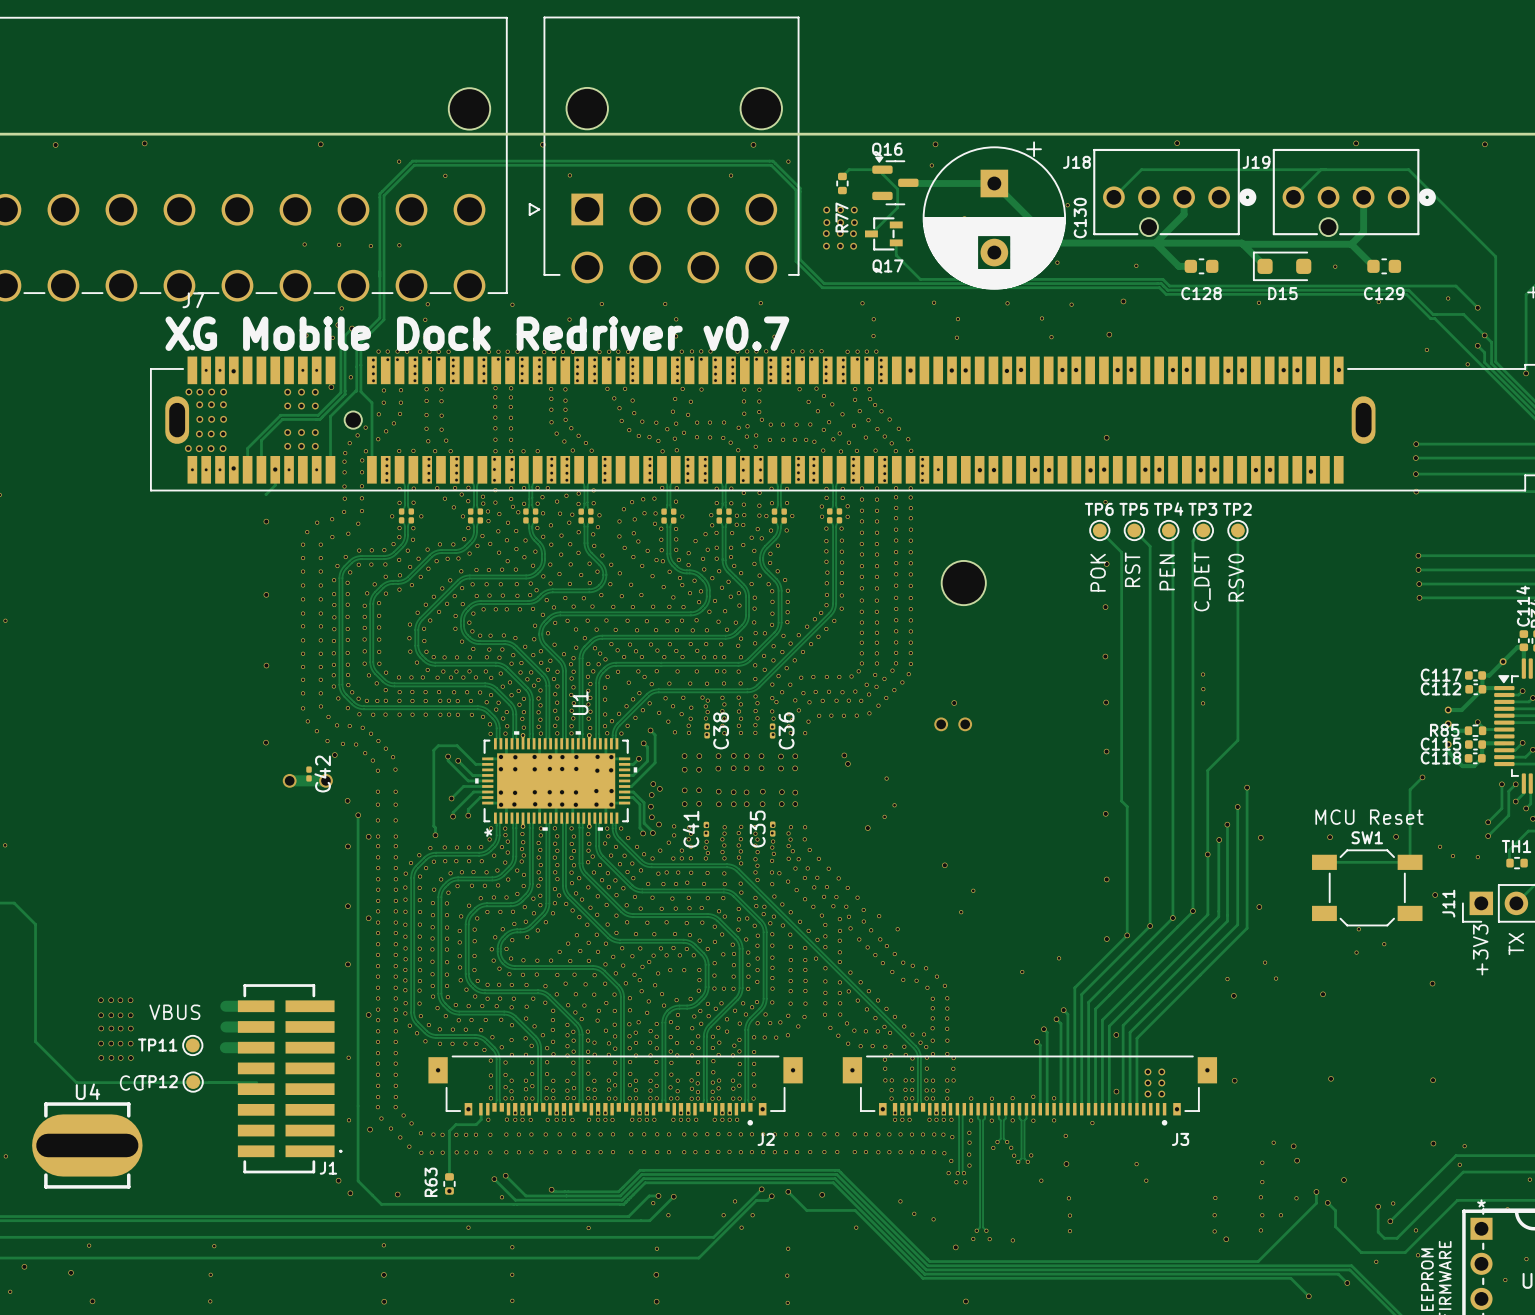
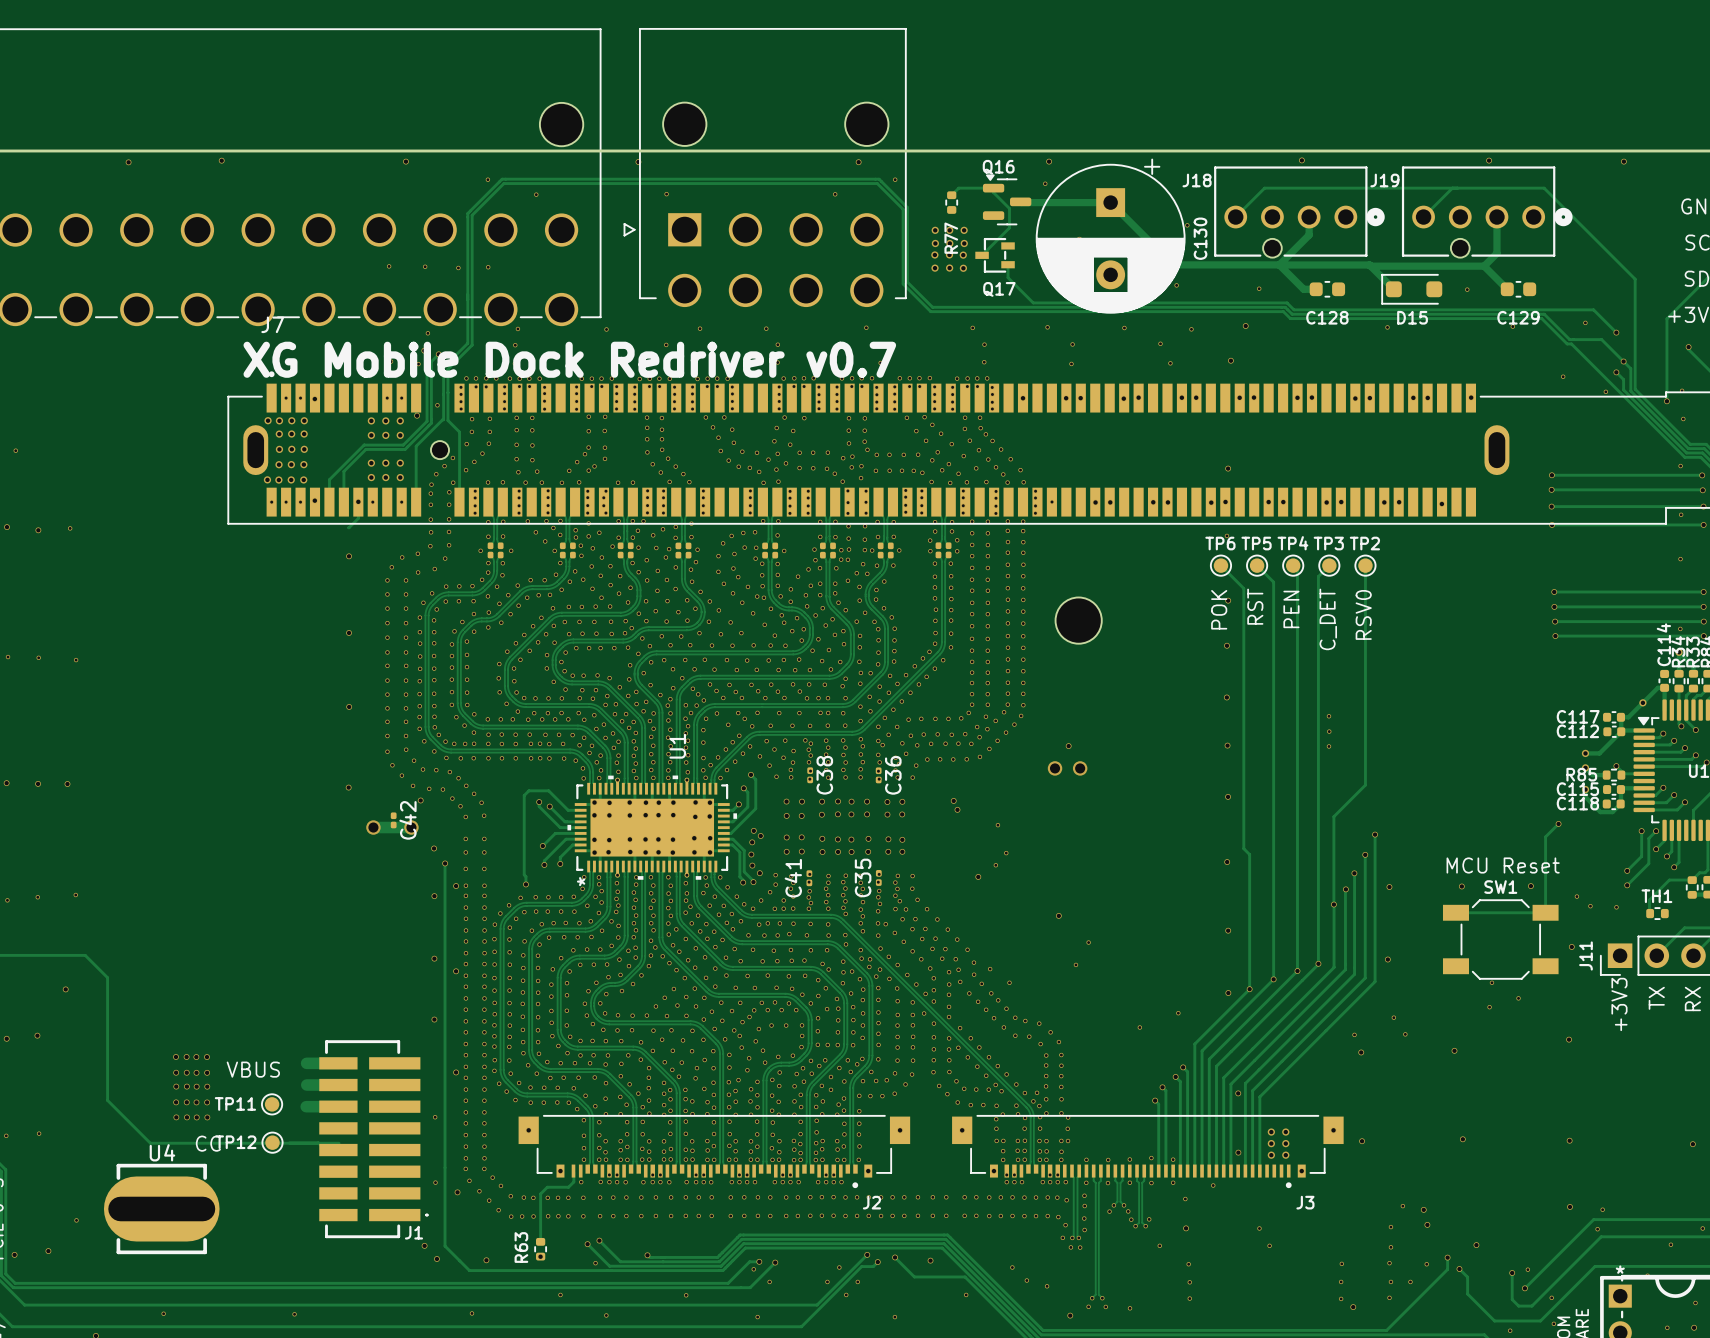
via: (495, 397) -> none
via: (510, 397) -> none
via: none -> (604, 430)
via: none -> (588, 431)
via: (495, 406) -> none
via: (510, 406) -> none
via: none -> (584, 454)
via: (495, 428) -> none
via: none -> (577, 462)
via: none -> (594, 466)
via: none -> (569, 470)
via: (511, 439) -> none
via: none -> (579, 482)
via: none -> (561, 482)
via: (495, 451) -> none
via: (511, 451) -> none
via: none -> (587, 497)
via: none -> (603, 497)
via: (494, 469) -> none
via: (511, 469) -> none
via: none -> (587, 505)
via: none -> (603, 505)
via: (511, 488) -> none
via: (511, 498) -> none
via: none -> (599, 532)
via: (512, 506) -> none

